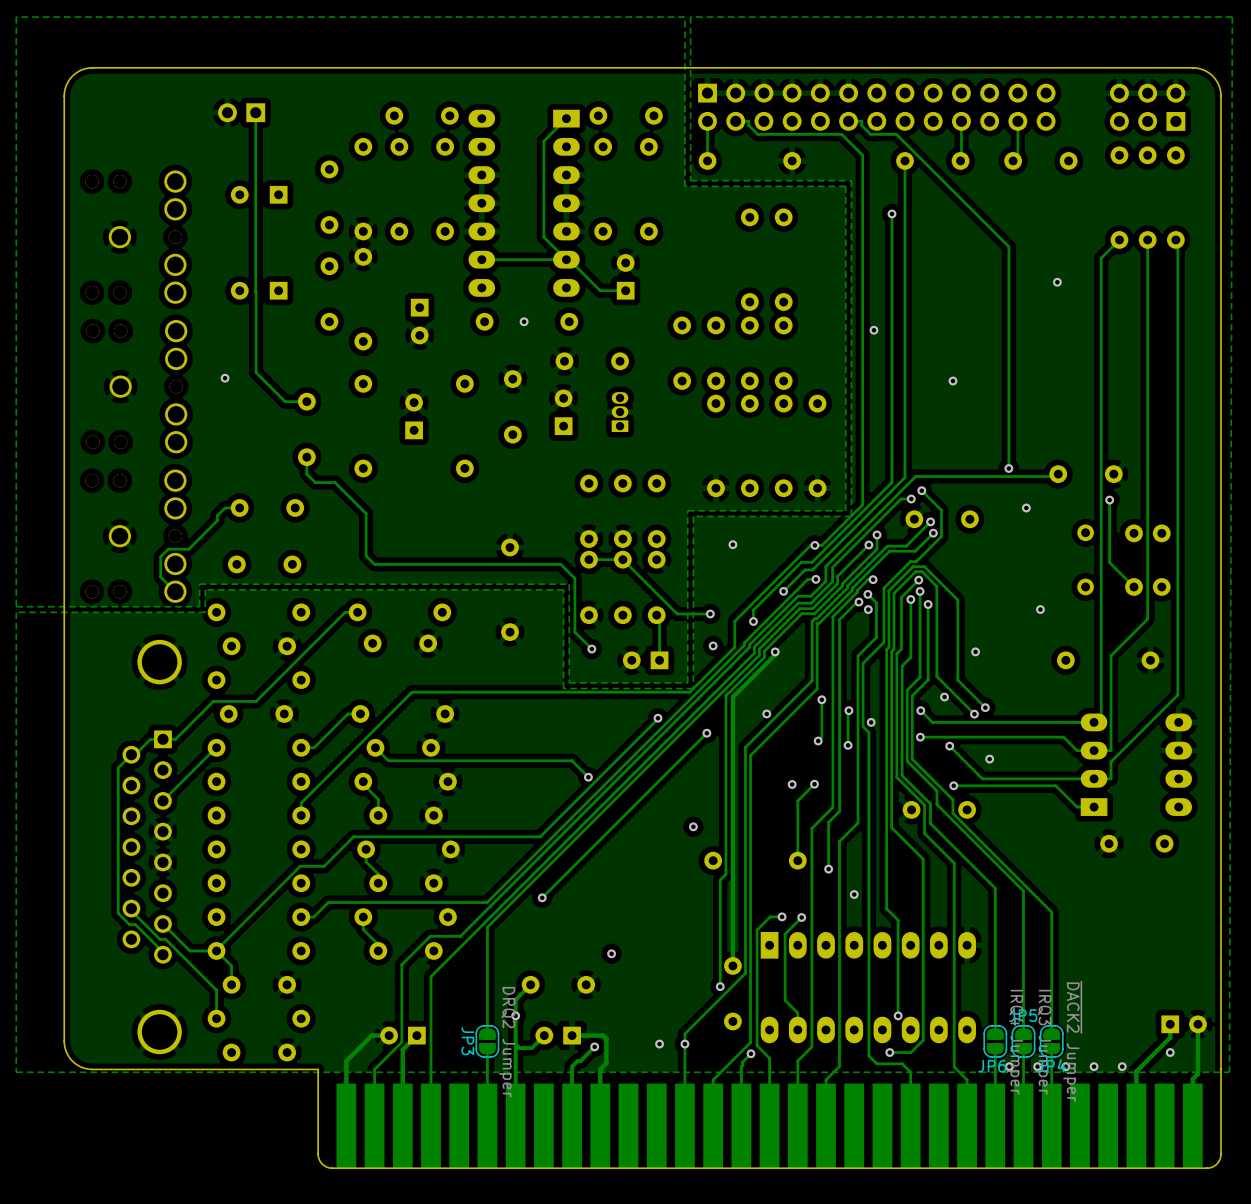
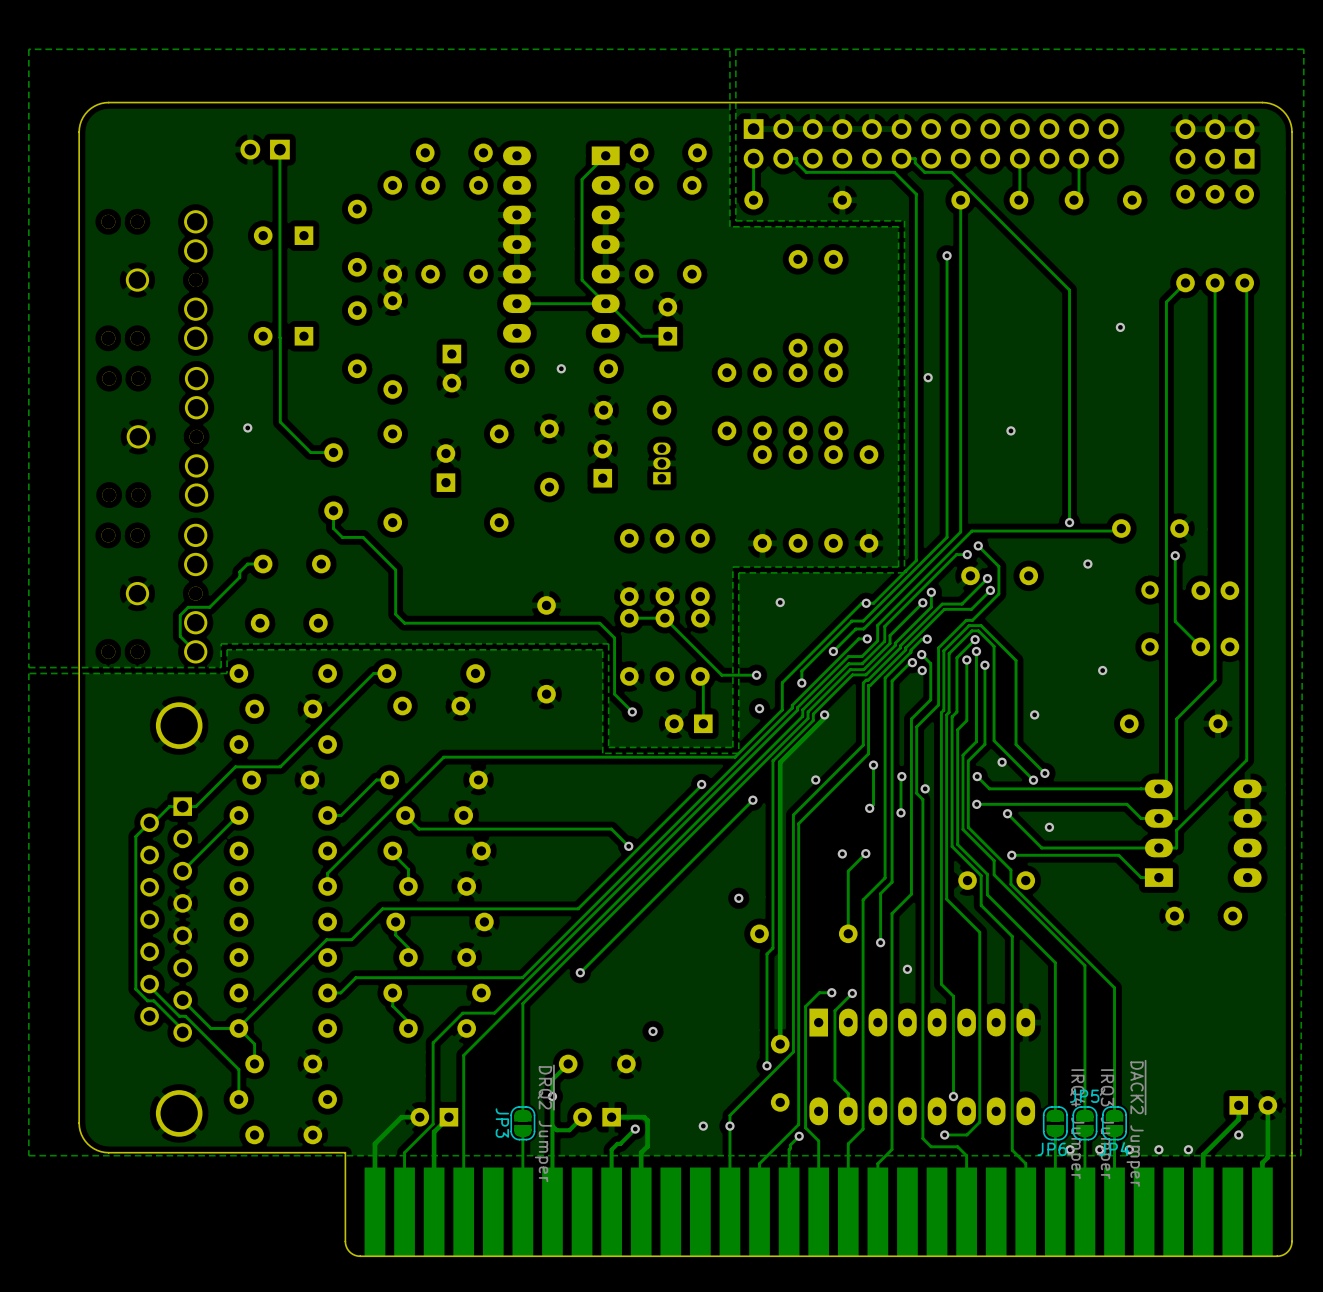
JP3 value: DRQ2 Jumper (507, 1042) -> ~{DRQ2} Jumper (544, 1123)

